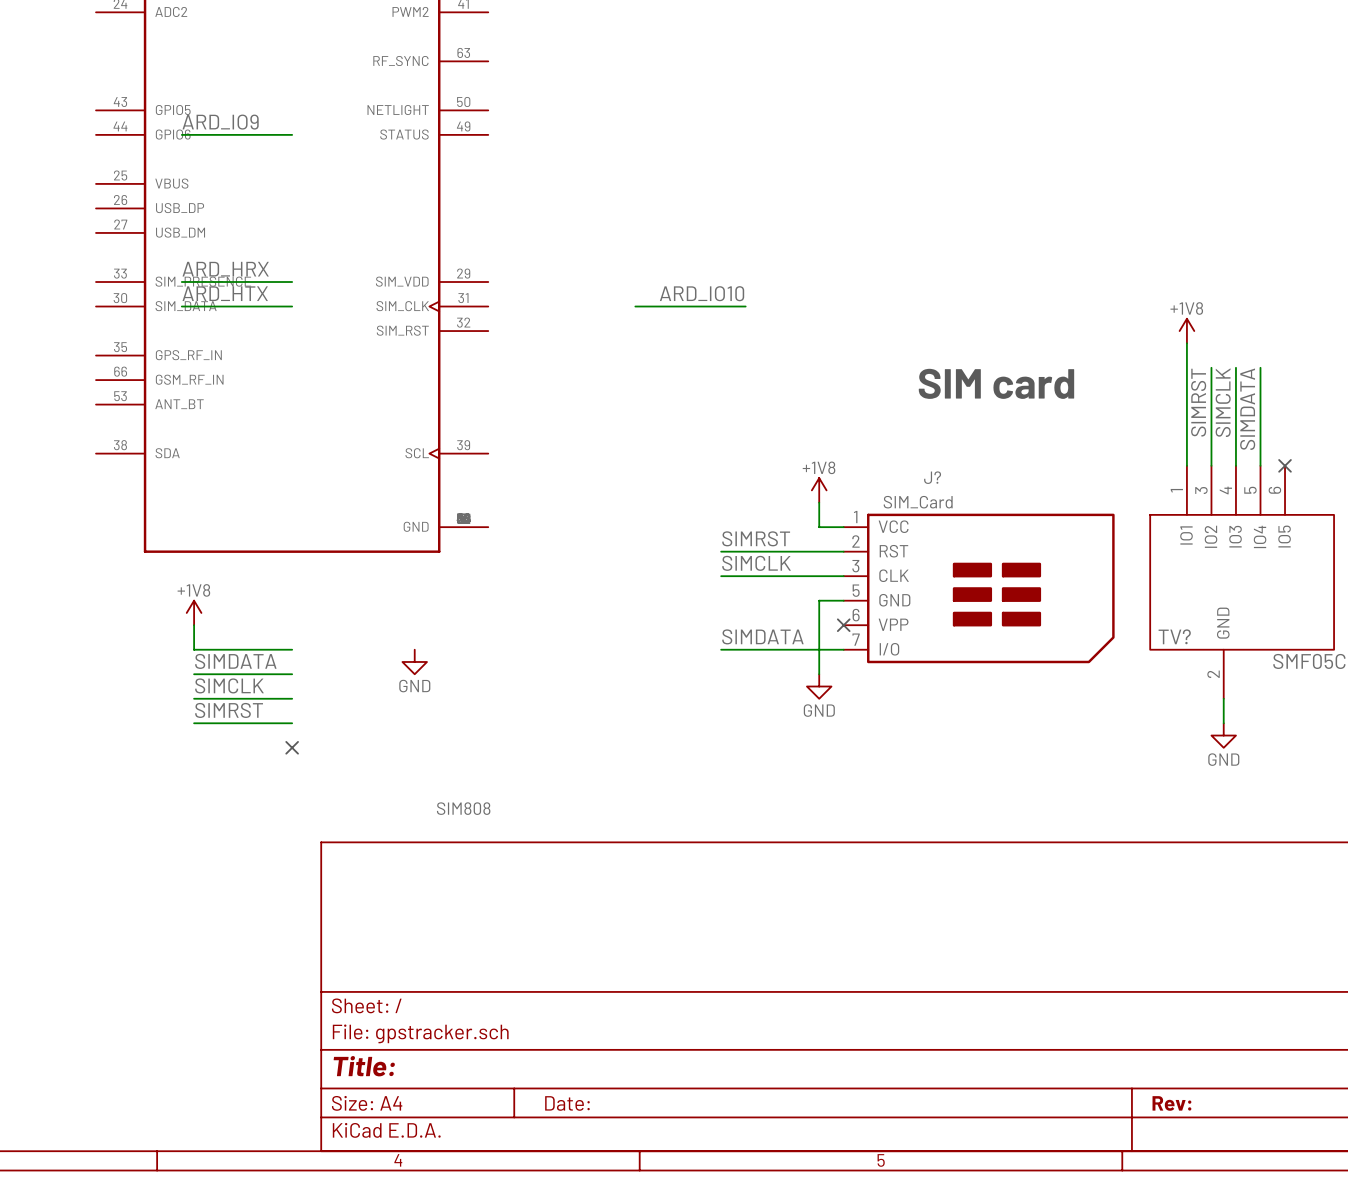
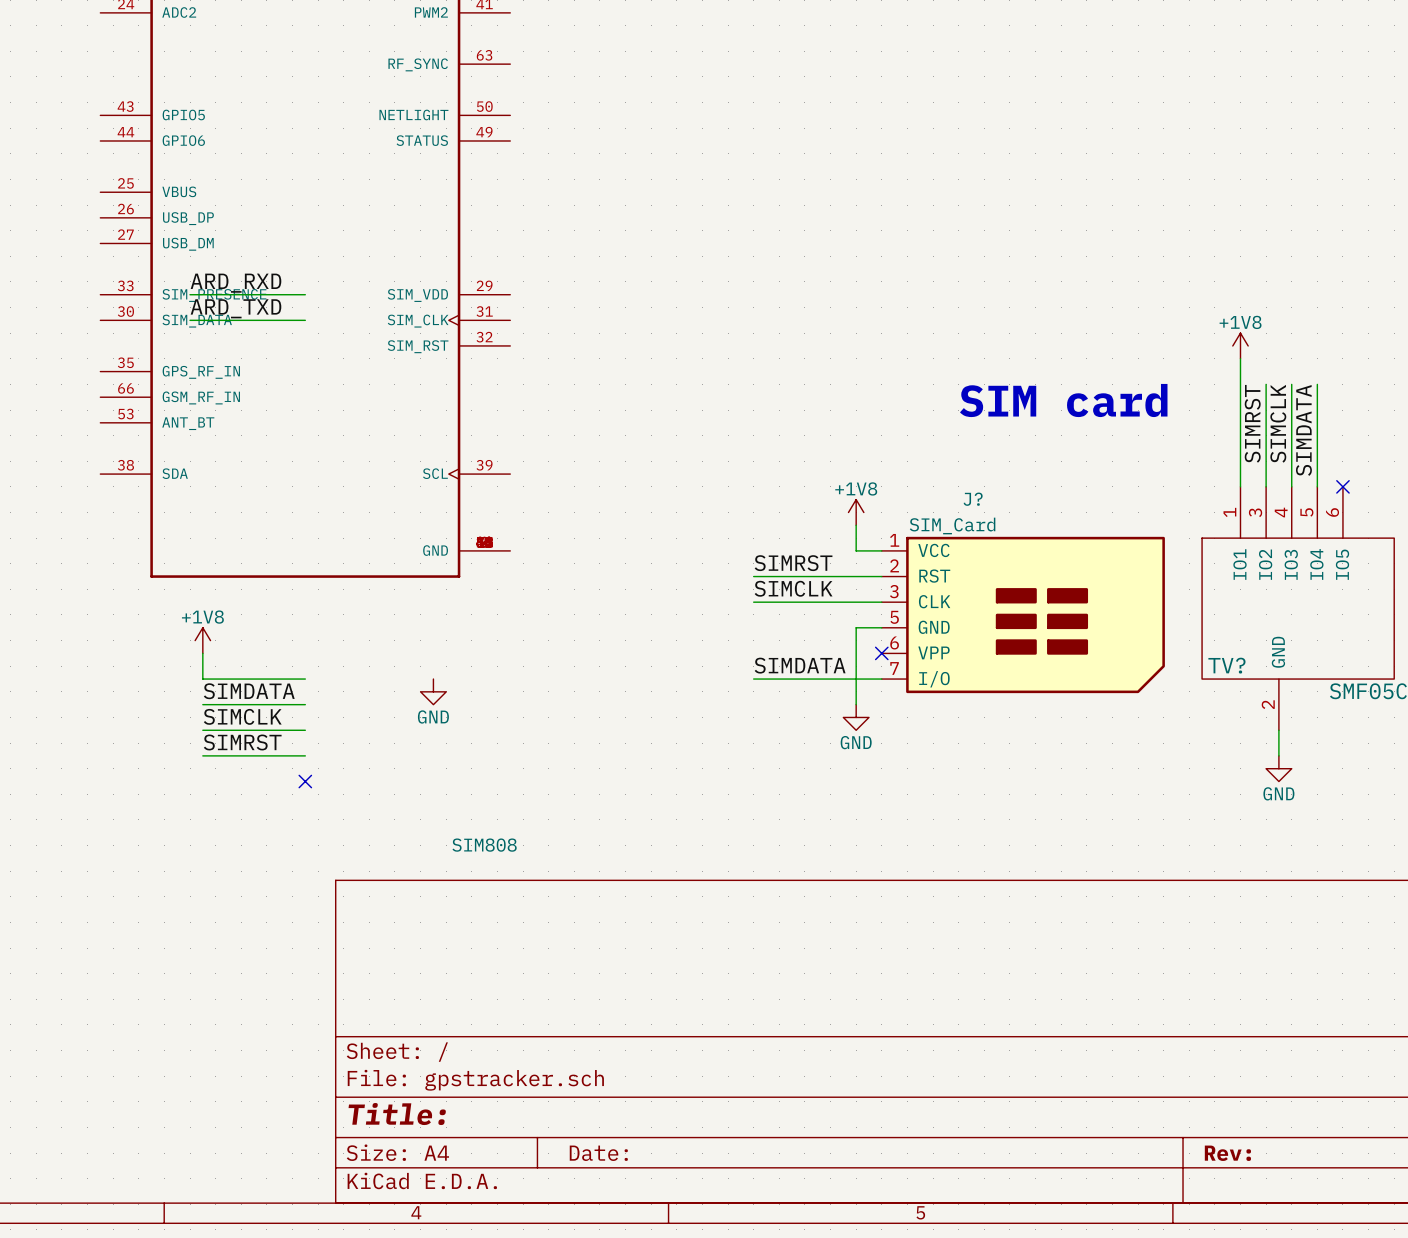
label: ARD_IO9 (220, 122) -> none
wire: (181, 134) (292, 134) -> none
label: ARD_HRX (225, 269) -> ARD_RXD (236, 283)
label: ARD_HTX (225, 293) -> ARD_TXD (236, 308)
label: ARD_IO10 (702, 293) -> none
wire: (635, 306) (745, 306) -> none

